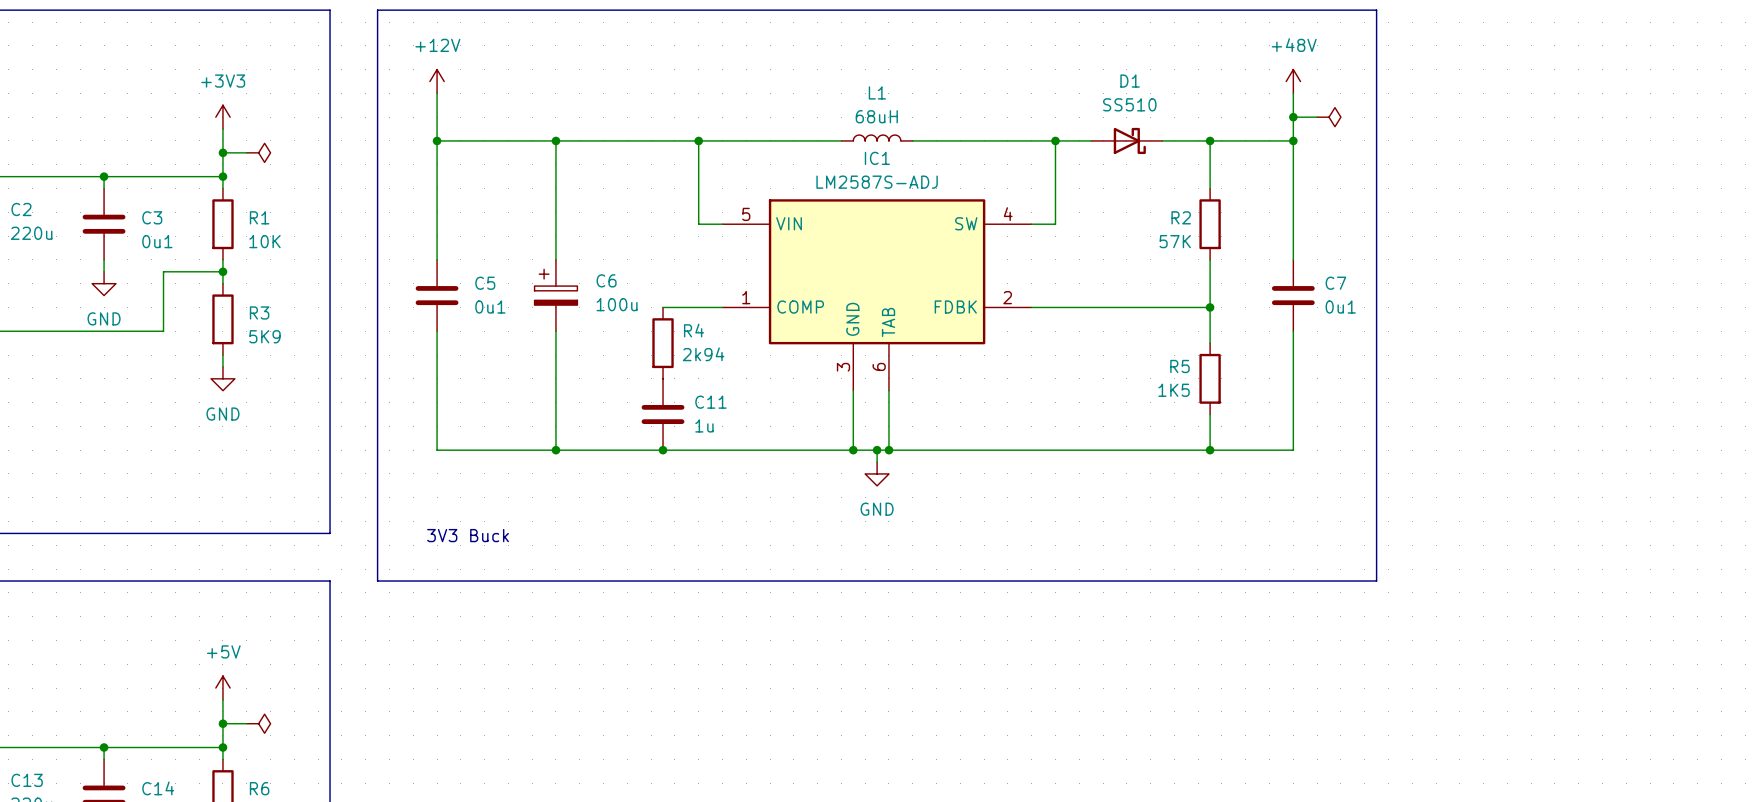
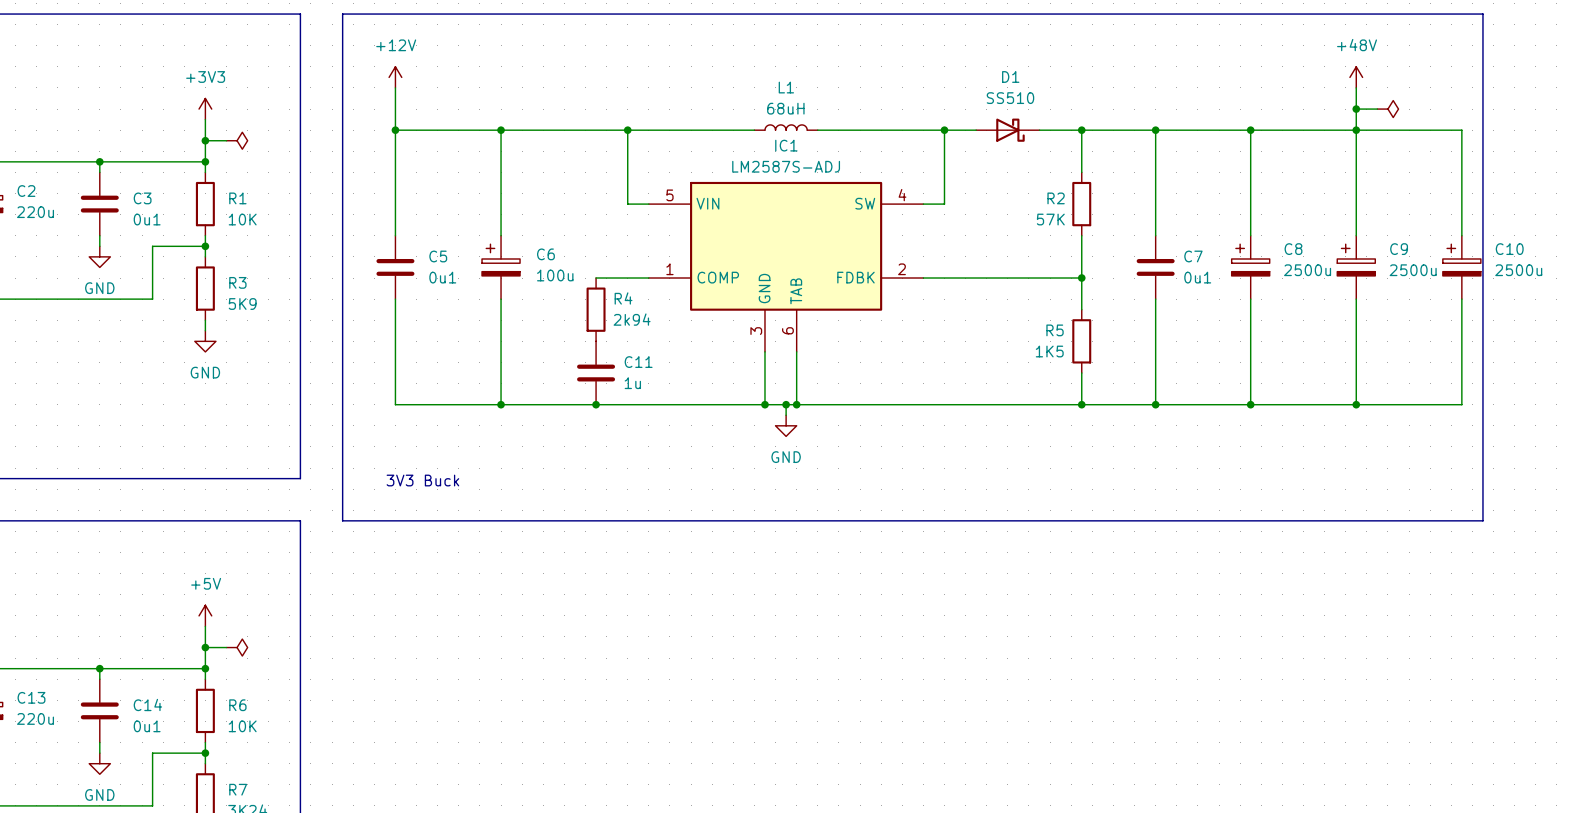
line: (1376, 10) (1376, 581) -> (1229, 14) (1482, 14) (1482, 520) (1229, 520)
power symbol position: +48V (1293, 81) -> +48V (1356, 77)
wire: (1293, 93) (1293, 140) -> (1461, 235) (1461, 130) (1155, 130)
wire: none -> (1356, 87) (1356, 235)
wire: (1293, 117) (1317, 117) -> (1356, 109) (1377, 109)
junction: (1293, 117) -> none
power symbol position: (1329, 117) -> (1387, 109)
junction: none -> (1356, 109)
wire: none -> (1250, 130) (1250, 235)
junction: none -> (1250, 130)
junction: none -> (1356, 130)
C8: none -> 2500u (1250, 267)
C9: none -> 2500u (1356, 267)
C10: none -> 2500u (1461, 267)
wire: none -> (1250, 299) (1250, 404)
wire: none -> (1356, 299) (1356, 404)
wire: none -> (1461, 299) (1461, 404) (1155, 404)
junction: none -> (1155, 404)
junction: none -> (1250, 404)
junction: none -> (1356, 404)

